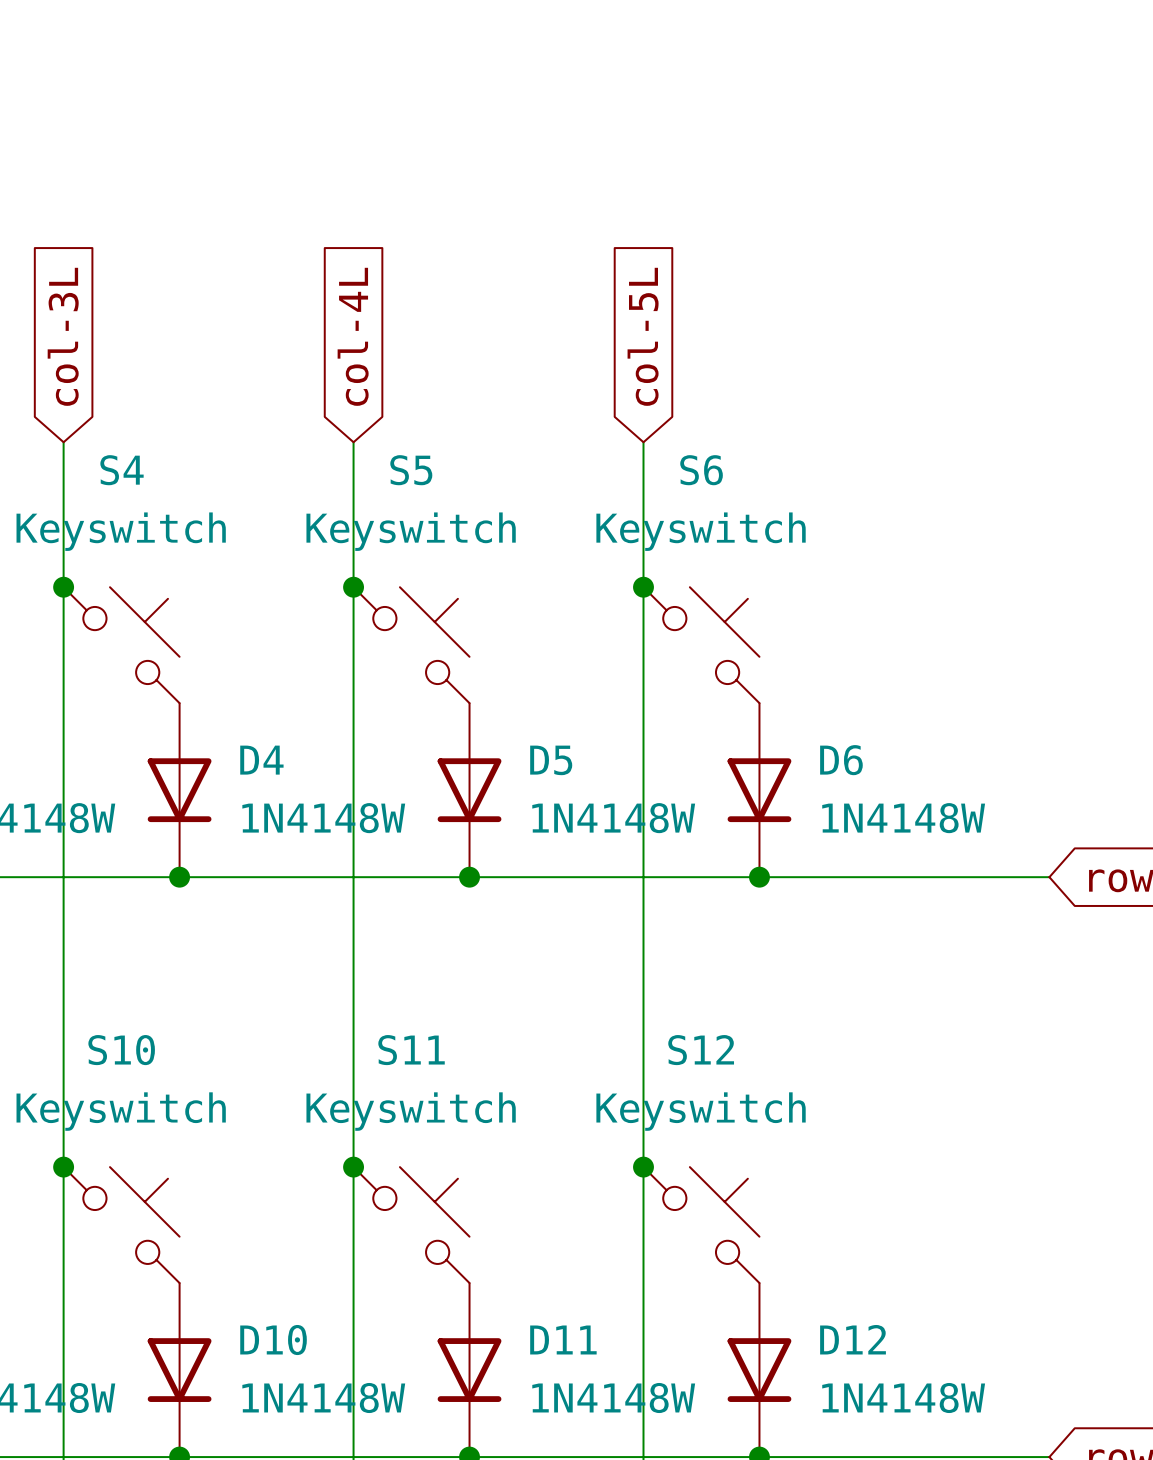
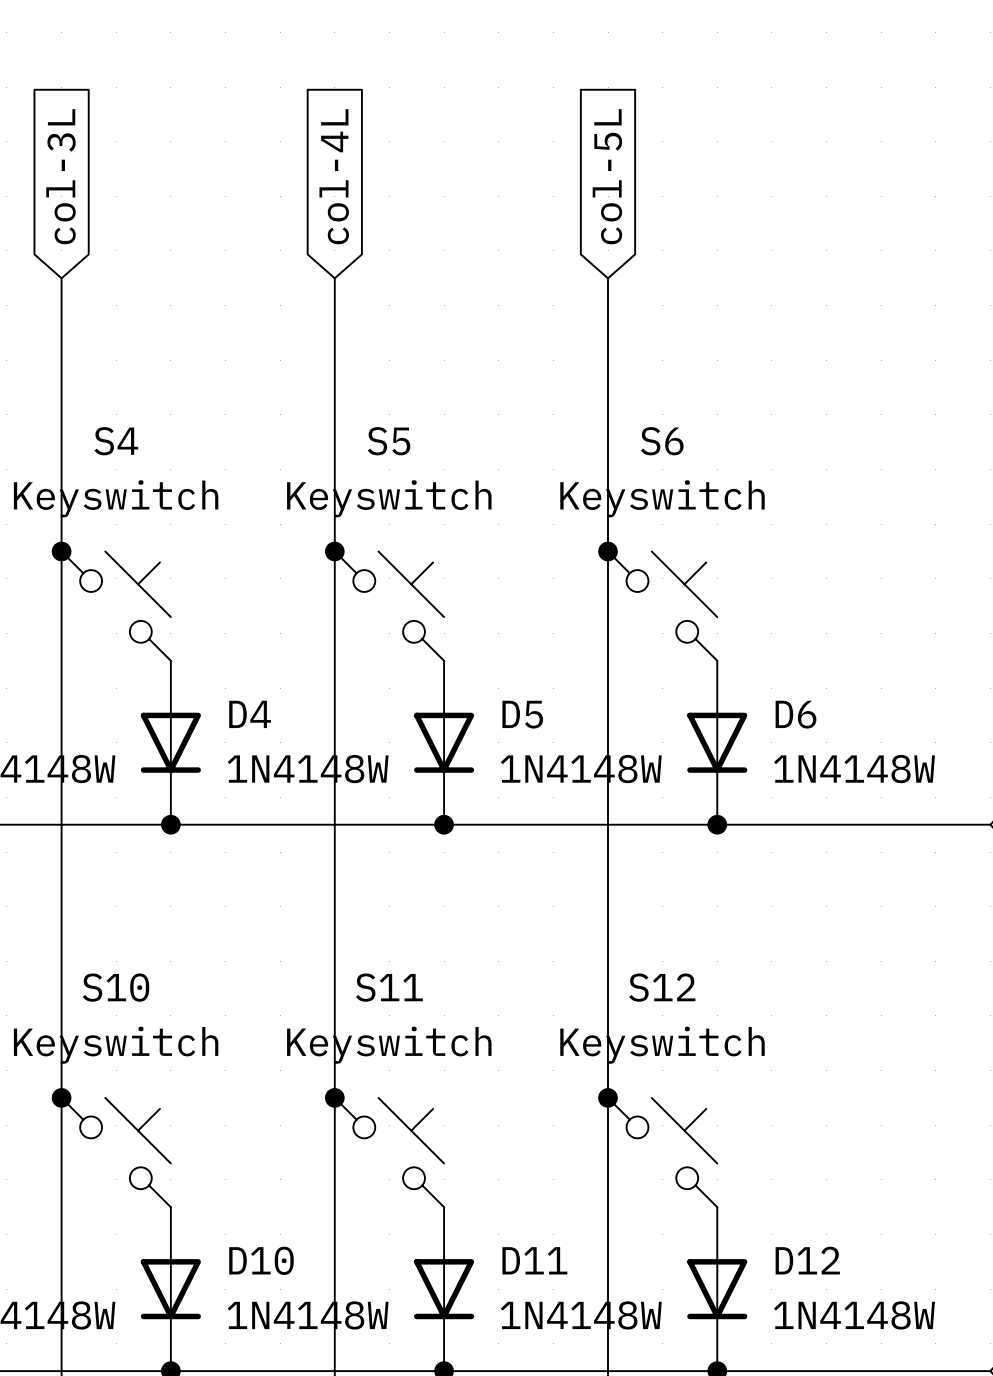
wire: none -> (61, 278) (61, 414)
wire: none -> (334, 278) (334, 414)
wire: none -> (608, 278) (608, 414)
global label position: col-3L (63, 336) -> col-3L (61, 176)
global label position: col-4L (353, 336) -> col-4L (334, 176)
global label position: col-5L (643, 336) -> col-5L (607, 176)

